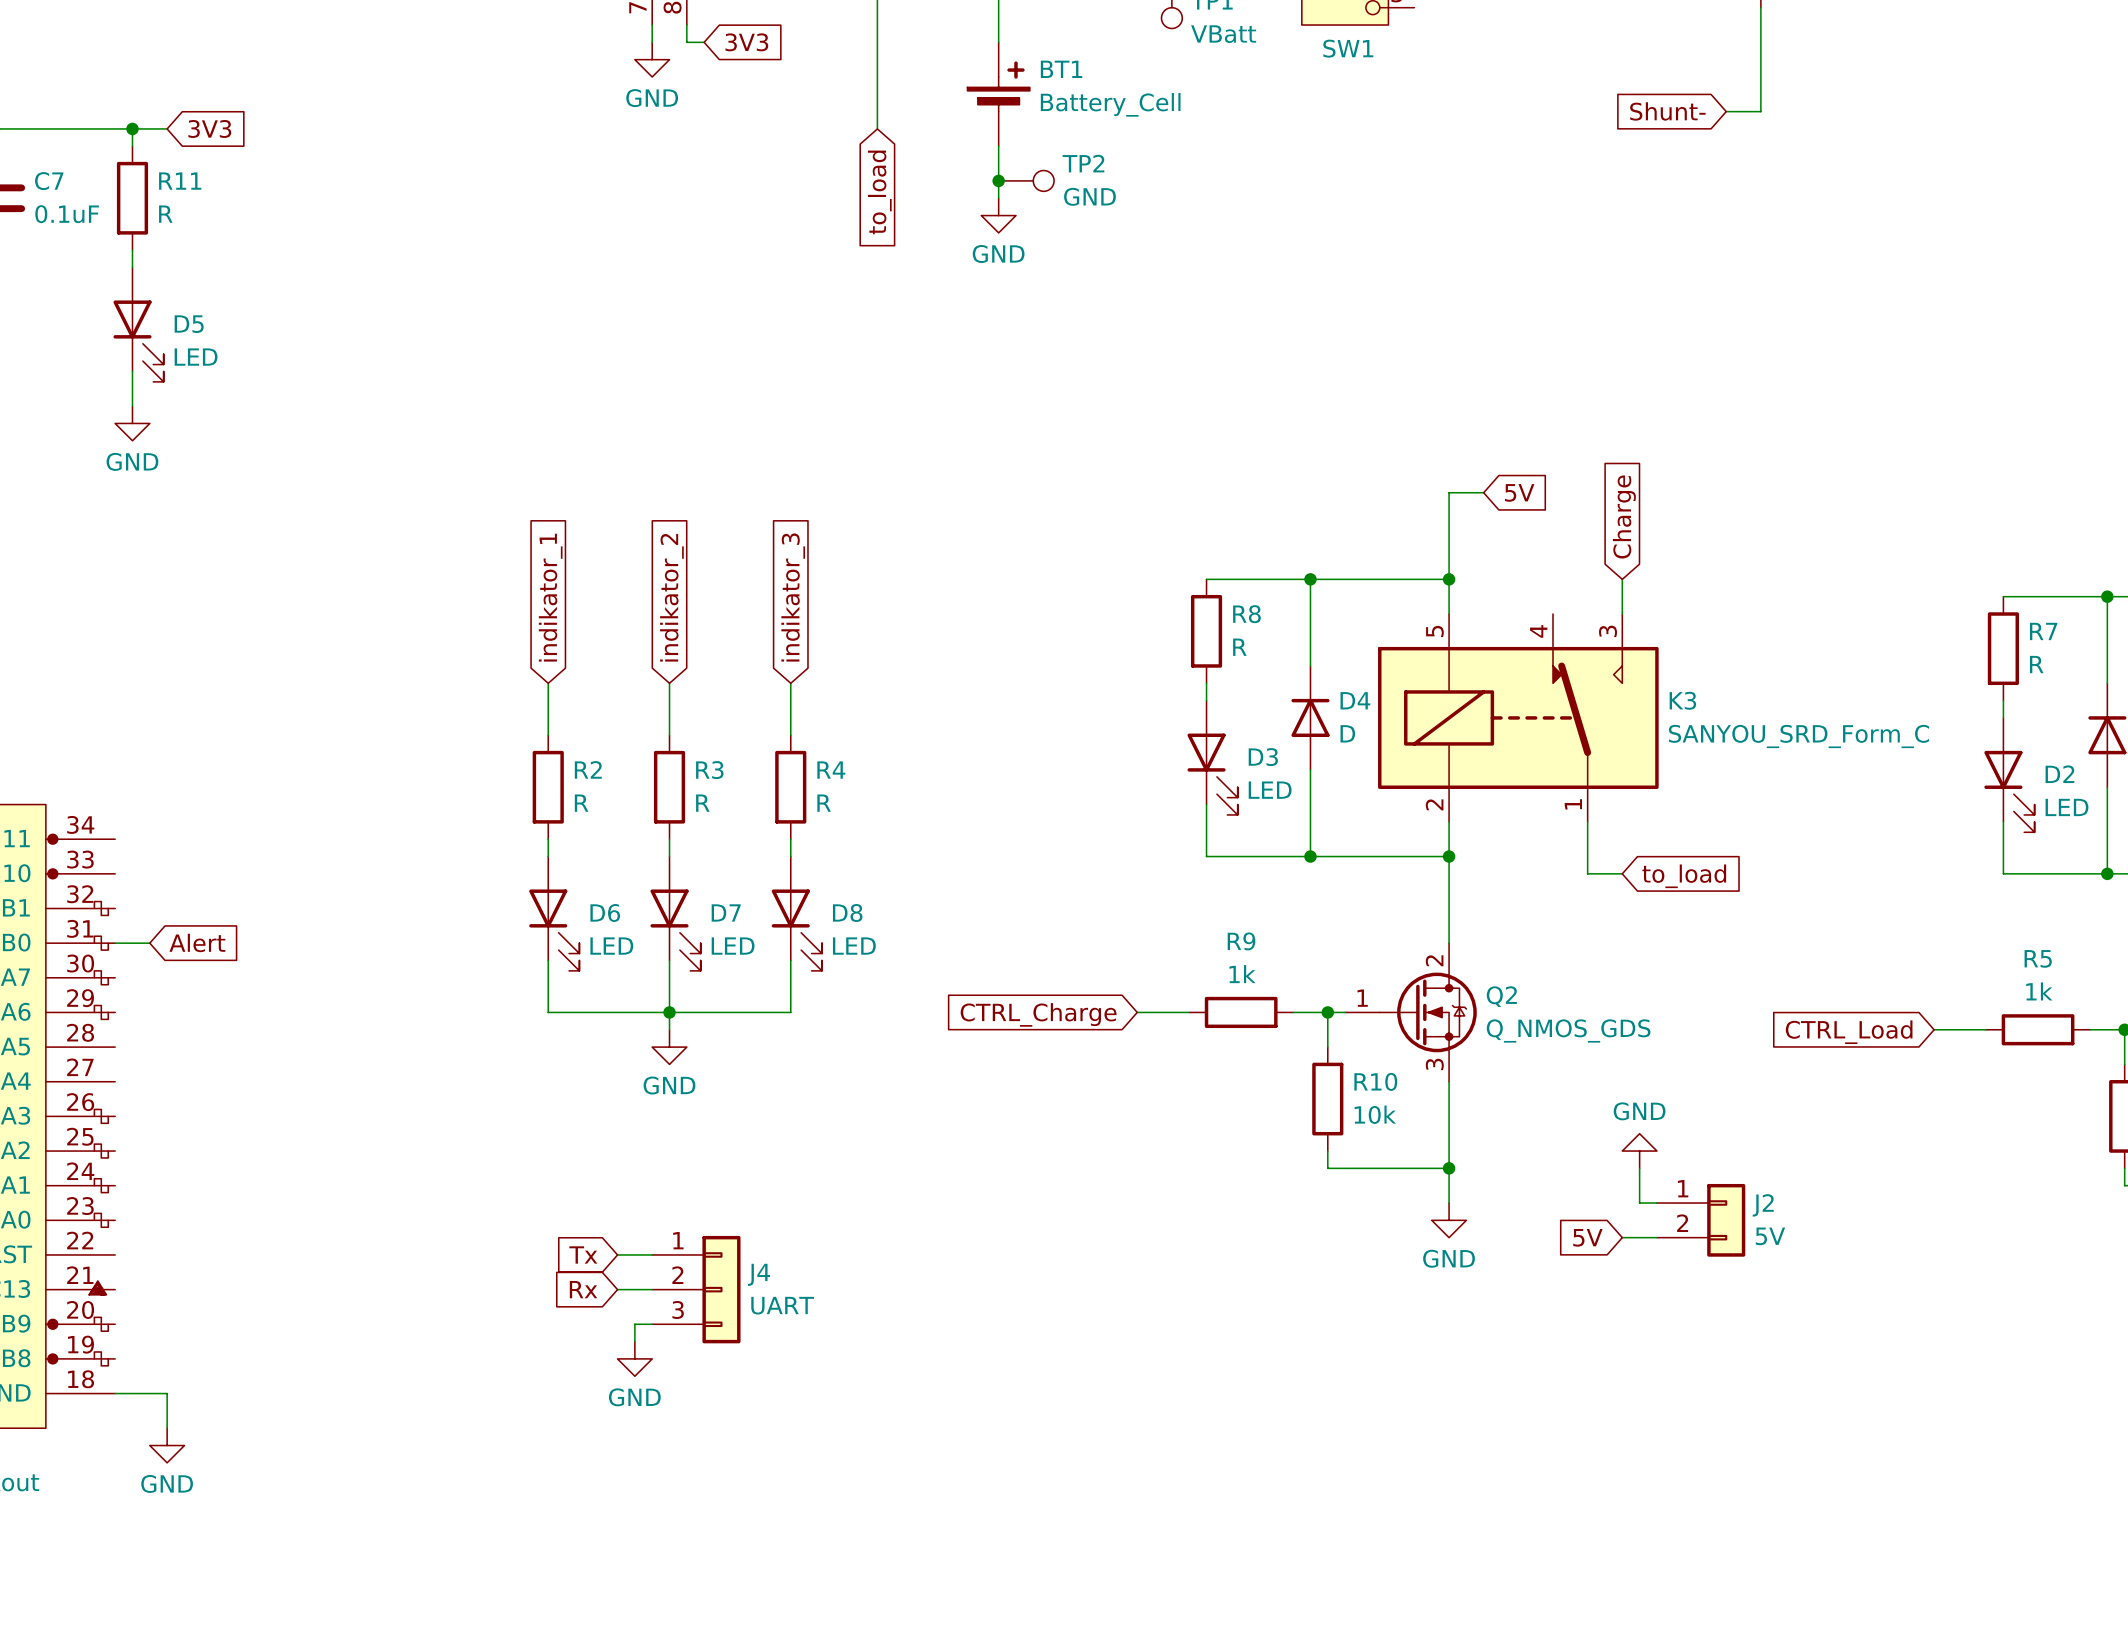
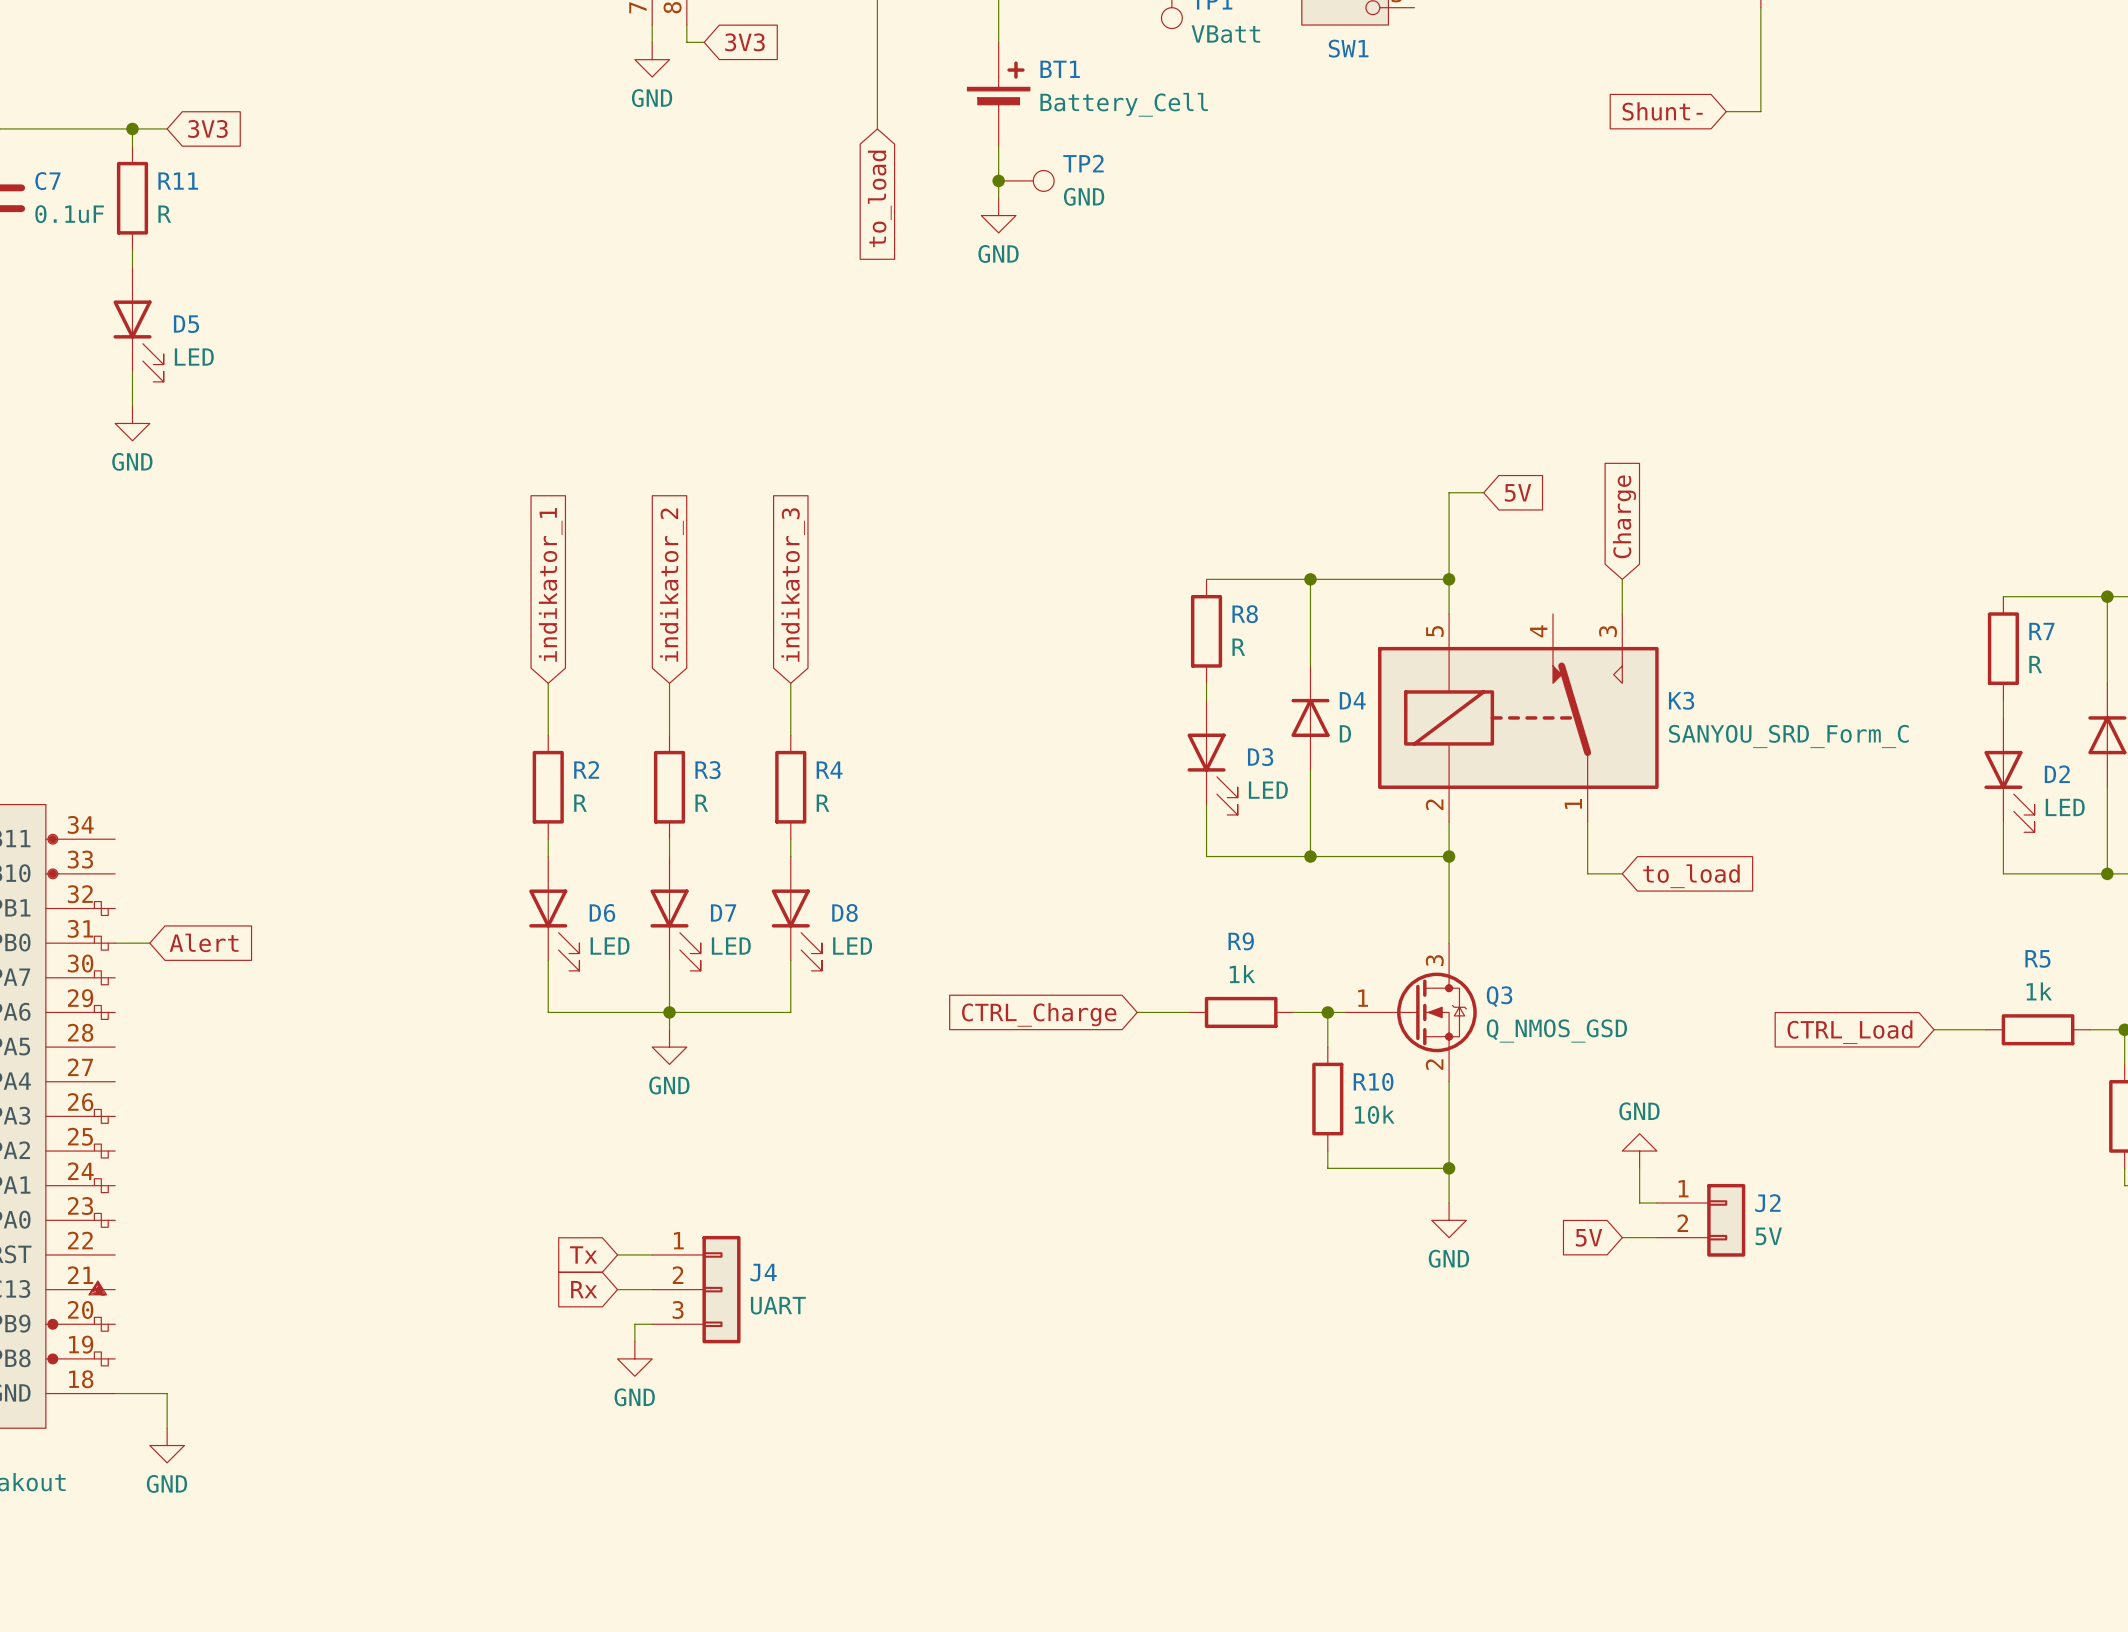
Q2 pin number: 2 (1434, 960) -> 3 (1434, 960)
Q2 name: Q2 (1501, 996) -> Q3 (1499, 996)
Q2 value: Q_NMOS_GDS (1568, 1030) -> Q_NMOS_GSD (1556, 1030)
Q2 pin number: 3 (1434, 1064) -> 2 (1434, 1064)

